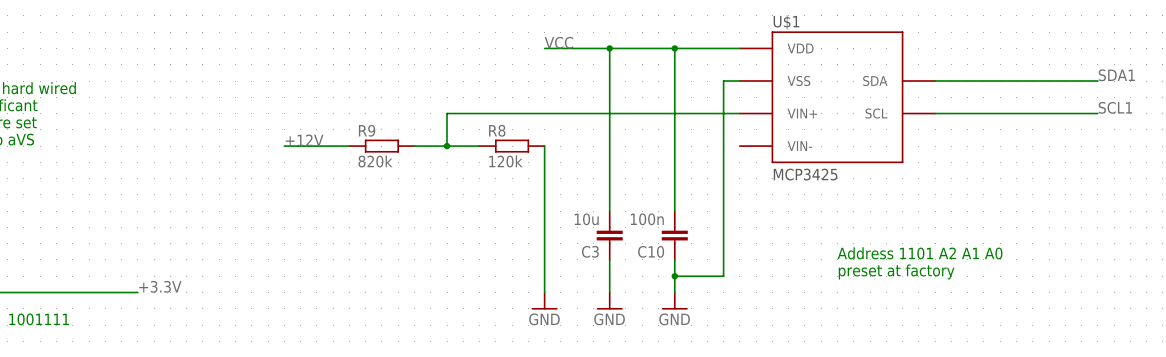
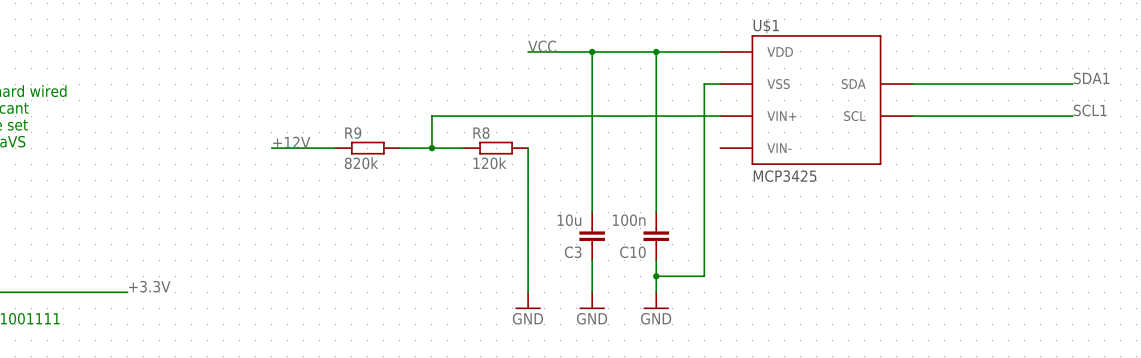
text: Address 1101 A2 A1 A0 (920, 253) -> none
text: preset at factory (896, 271) -> none

